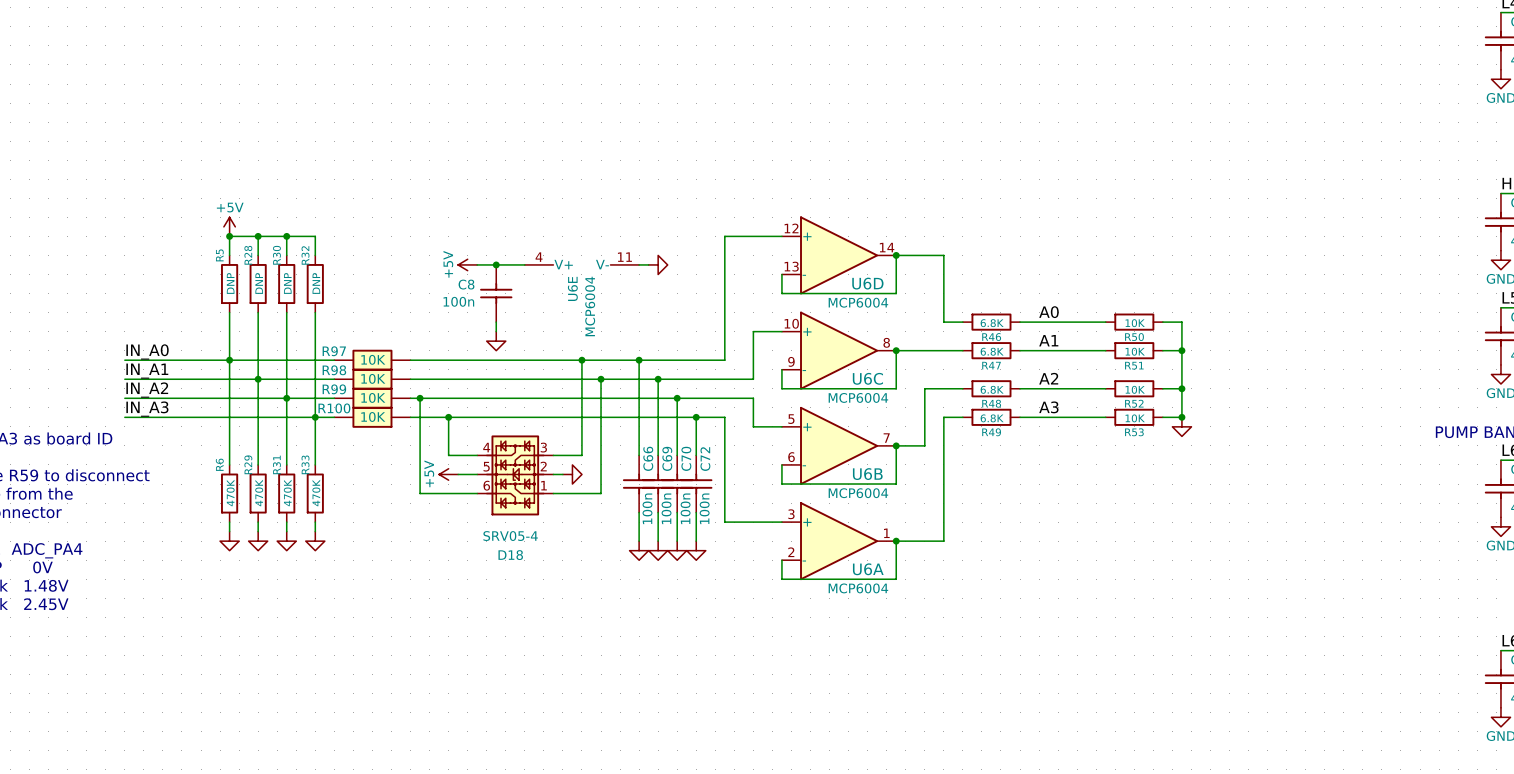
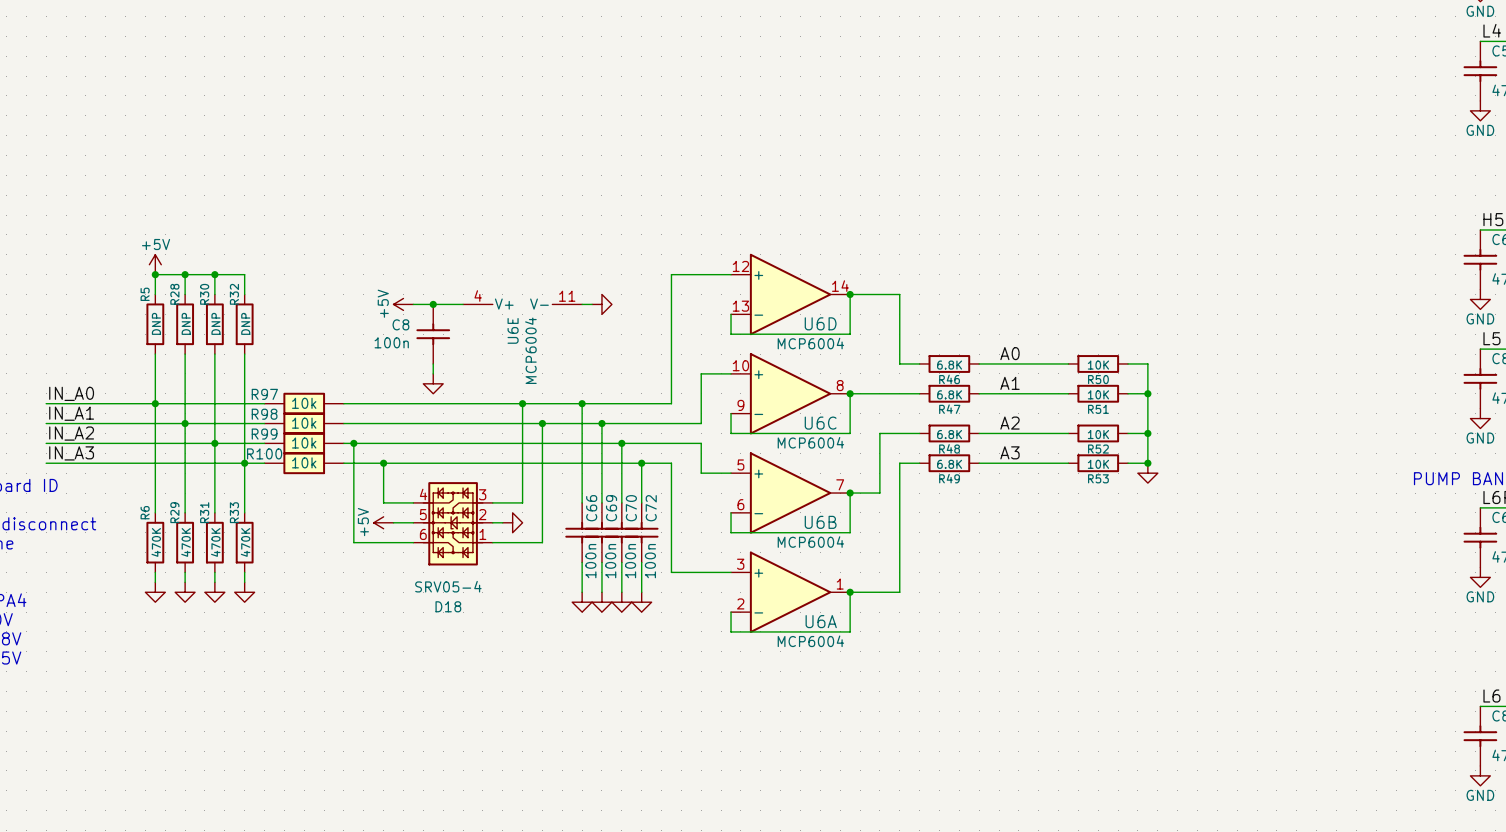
R97 value: 10K (373, 359) -> 10k (304, 403)
R98 value: 10K (373, 378) -> 10k (304, 423)
R99 value: 10K (373, 397) -> 10k (304, 443)
R100 value: 10K (373, 416) -> 10k (304, 462)

